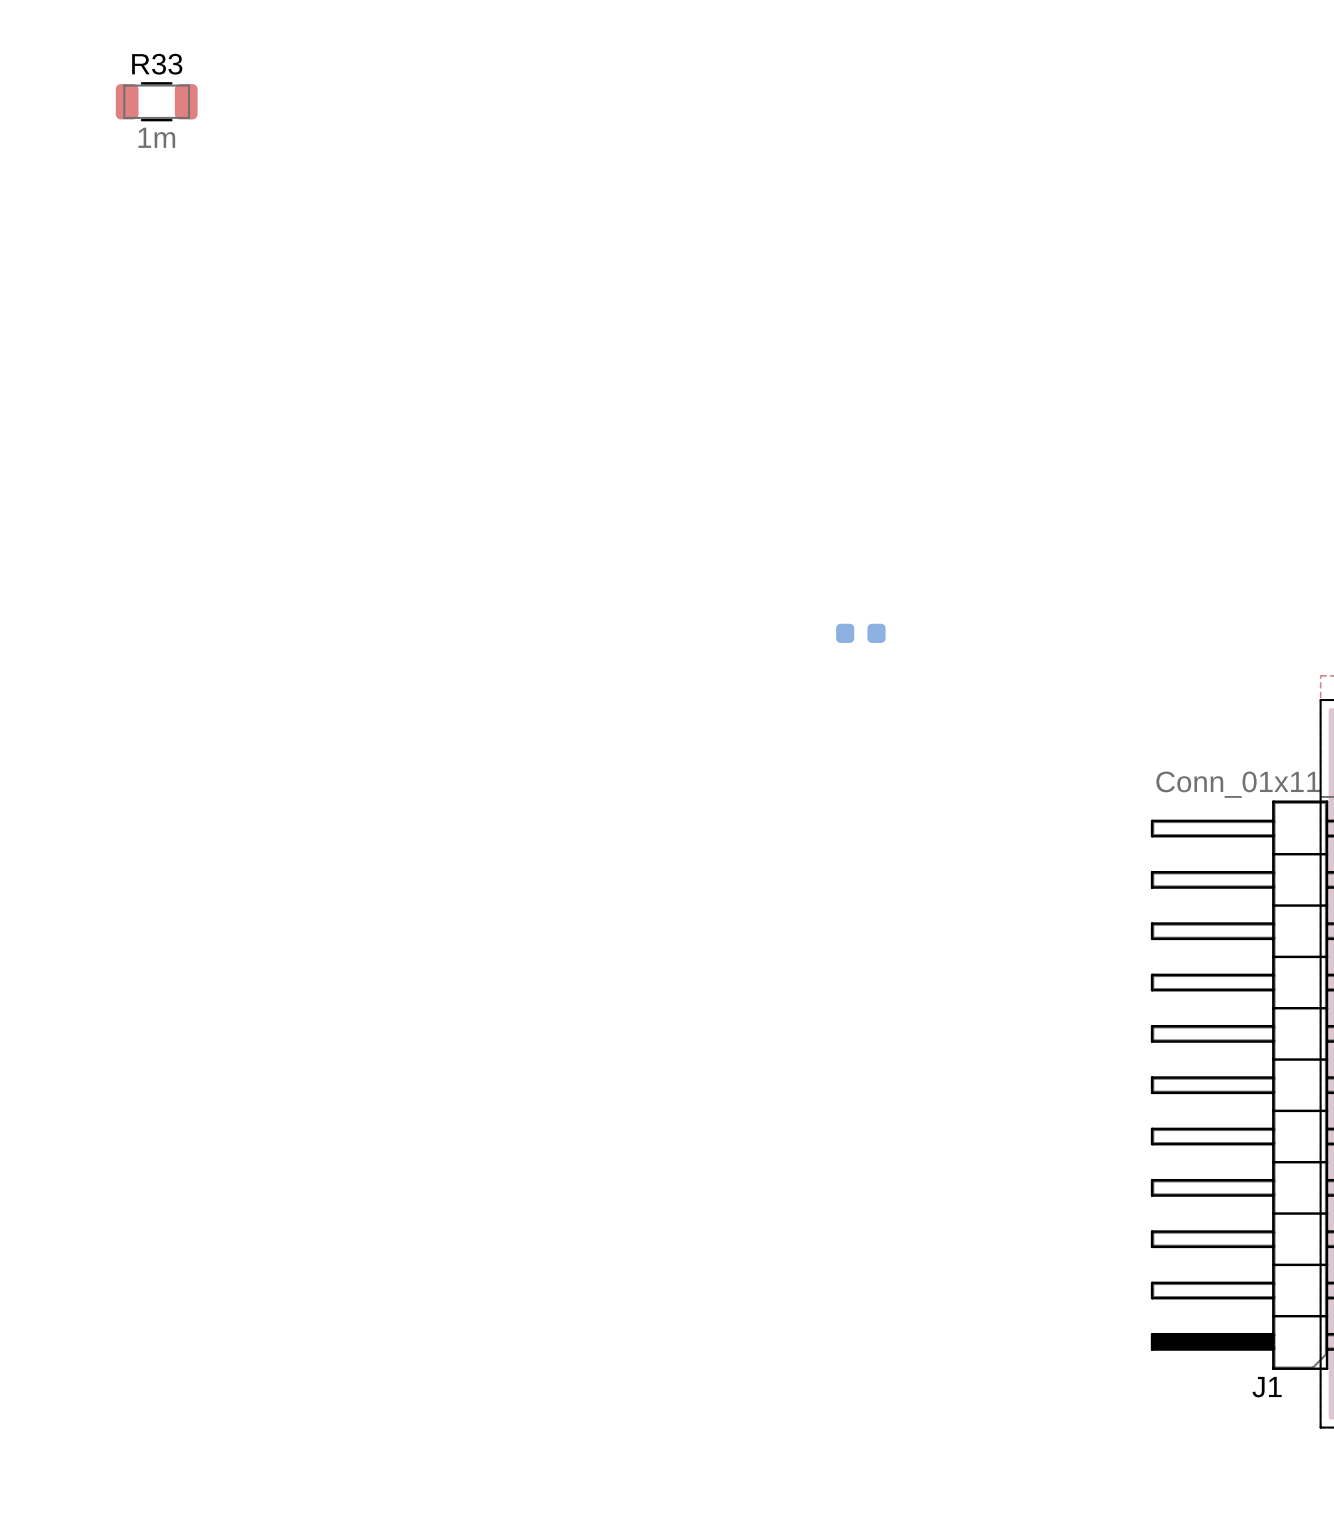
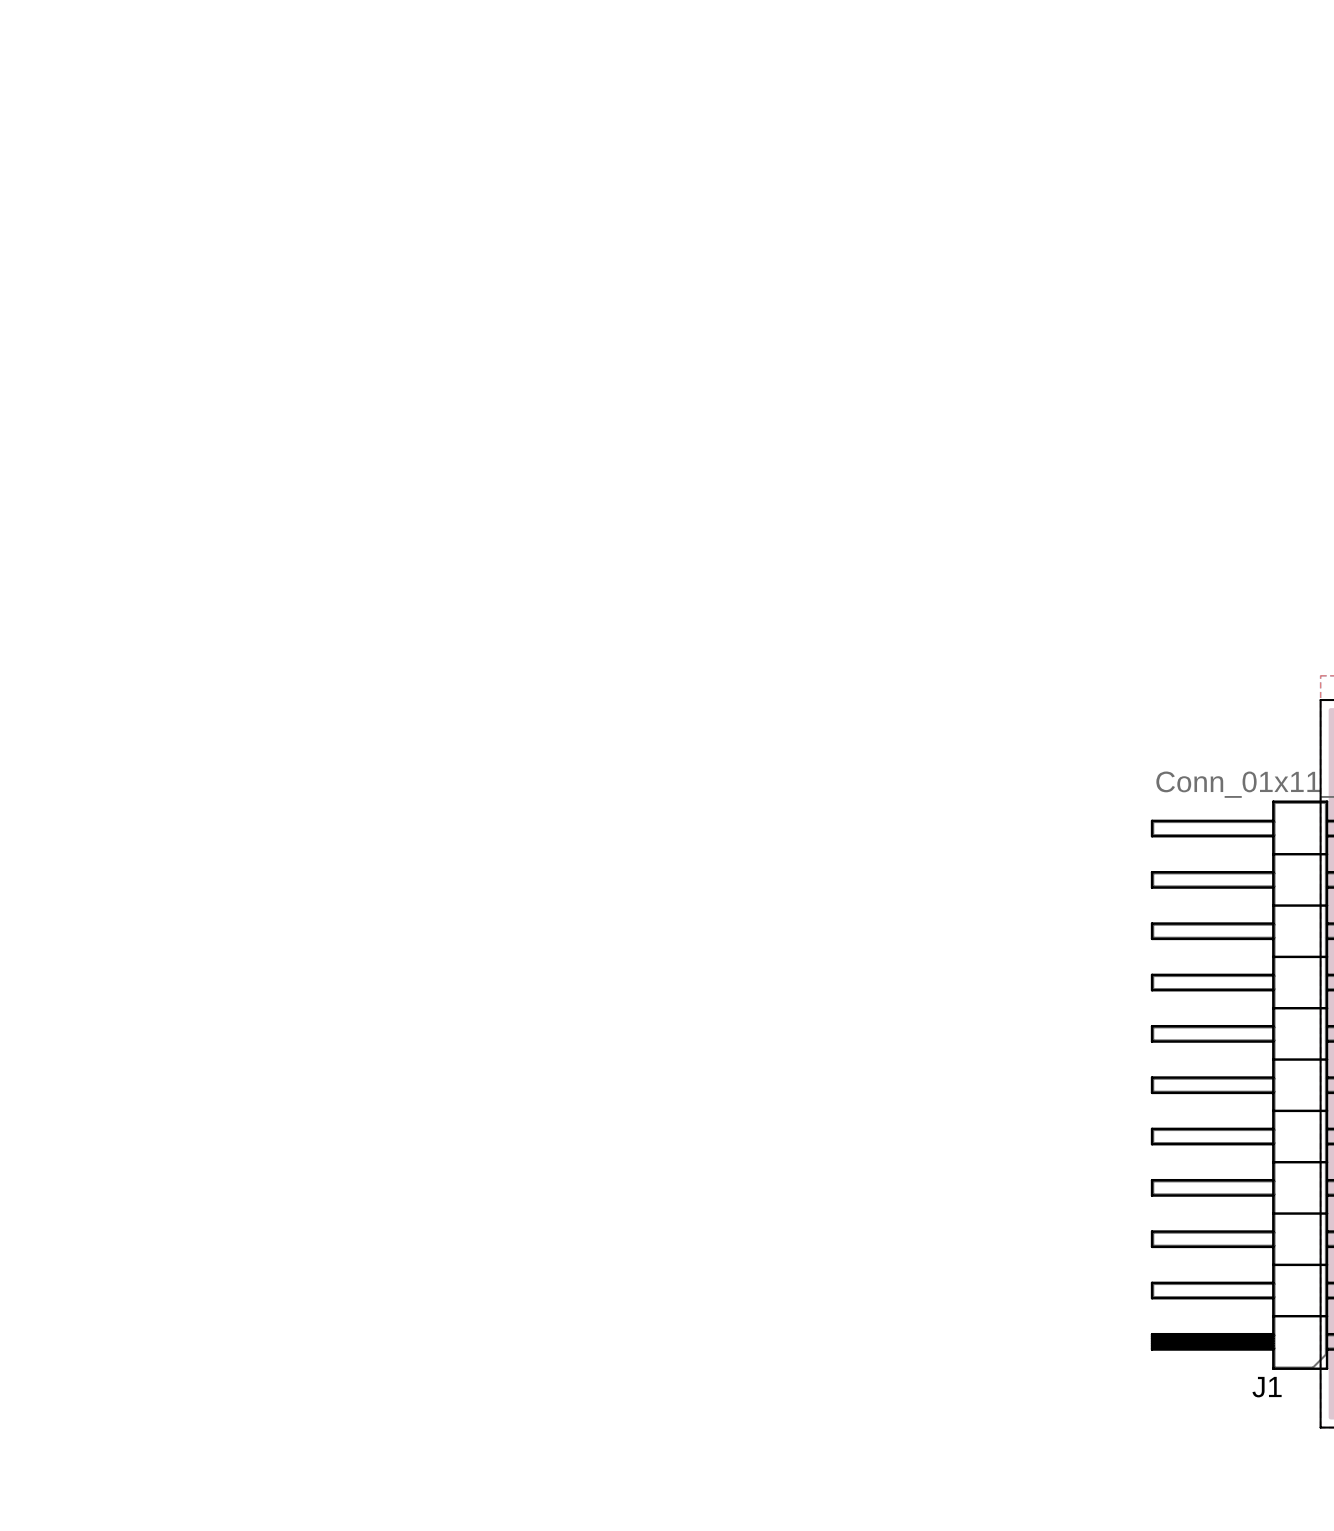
R33: 1m (156, 101) -> none
part: (860, 633) -> none

